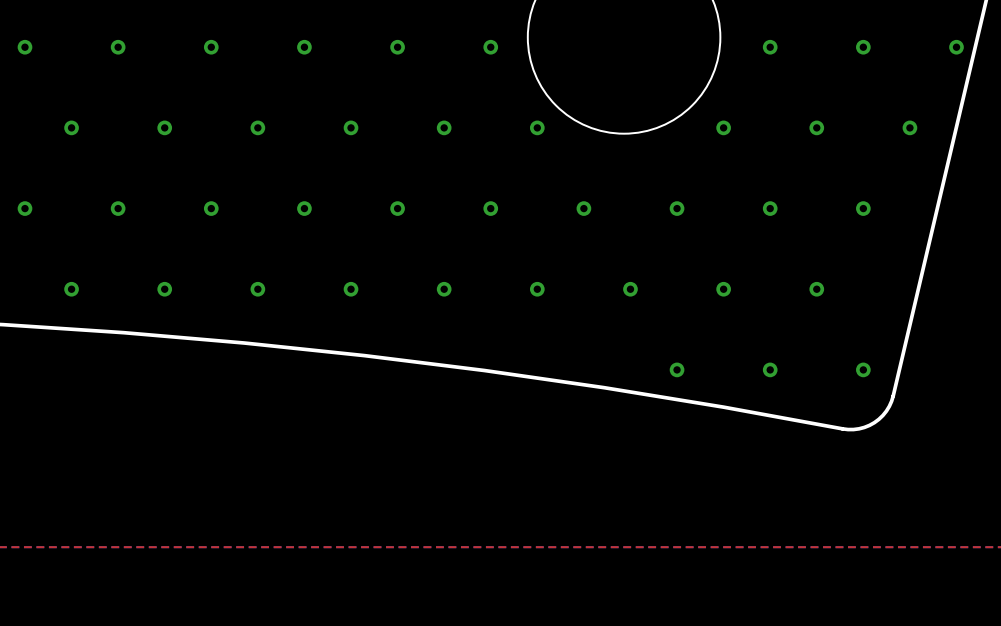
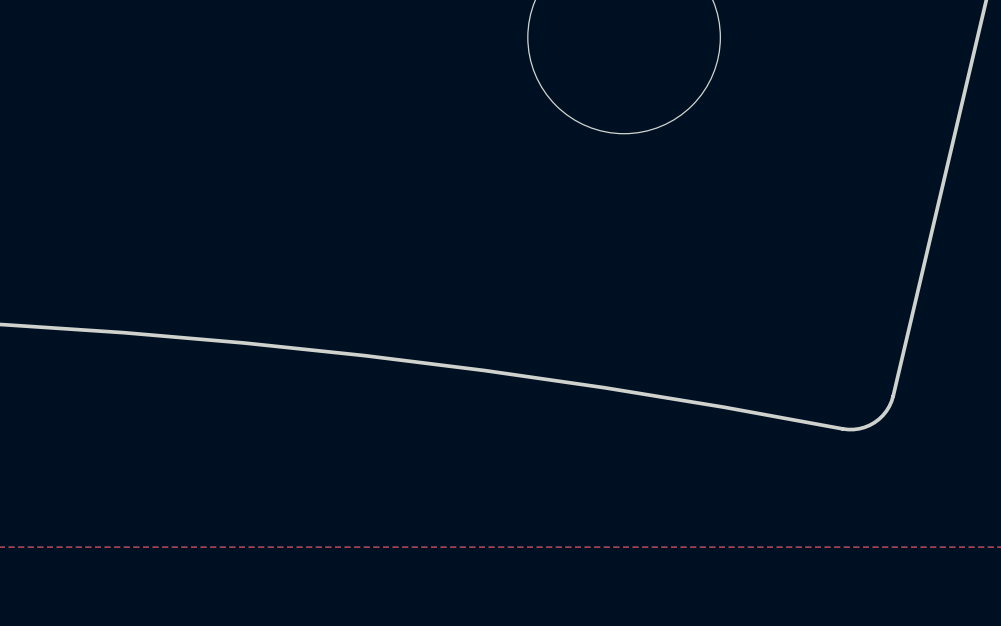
via: (24, 47) -> none
via: (118, 47) -> none
via: (211, 47) -> none
via: (304, 47) -> none
via: (397, 47) -> none
via: (490, 47) -> none
via: (770, 47) -> none
via: (863, 47) -> none
via: (956, 47) -> none
via: (71, 127) -> none
via: (164, 127) -> none
via: (257, 127) -> none
via: (351, 127) -> none
via: (444, 127) -> none
via: (537, 127) -> none
via: (723, 127) -> none
via: (816, 127) -> none
via: (909, 127) -> none
via: (24, 208) -> none
via: (118, 208) -> none
via: (211, 208) -> none
via: (304, 208) -> none
via: (397, 208) -> none
via: (490, 208) -> none
via: (583, 208) -> none
via: (677, 208) -> none
via: (770, 208) -> none
via: (863, 208) -> none
via: (71, 289) -> none
via: (164, 289) -> none
via: (257, 289) -> none
via: (351, 289) -> none
via: (444, 289) -> none
via: (537, 289) -> none
via: (630, 289) -> none
via: (723, 289) -> none
via: (816, 289) -> none
via: (677, 369) -> none
via: (770, 369) -> none
via: (863, 369) -> none

